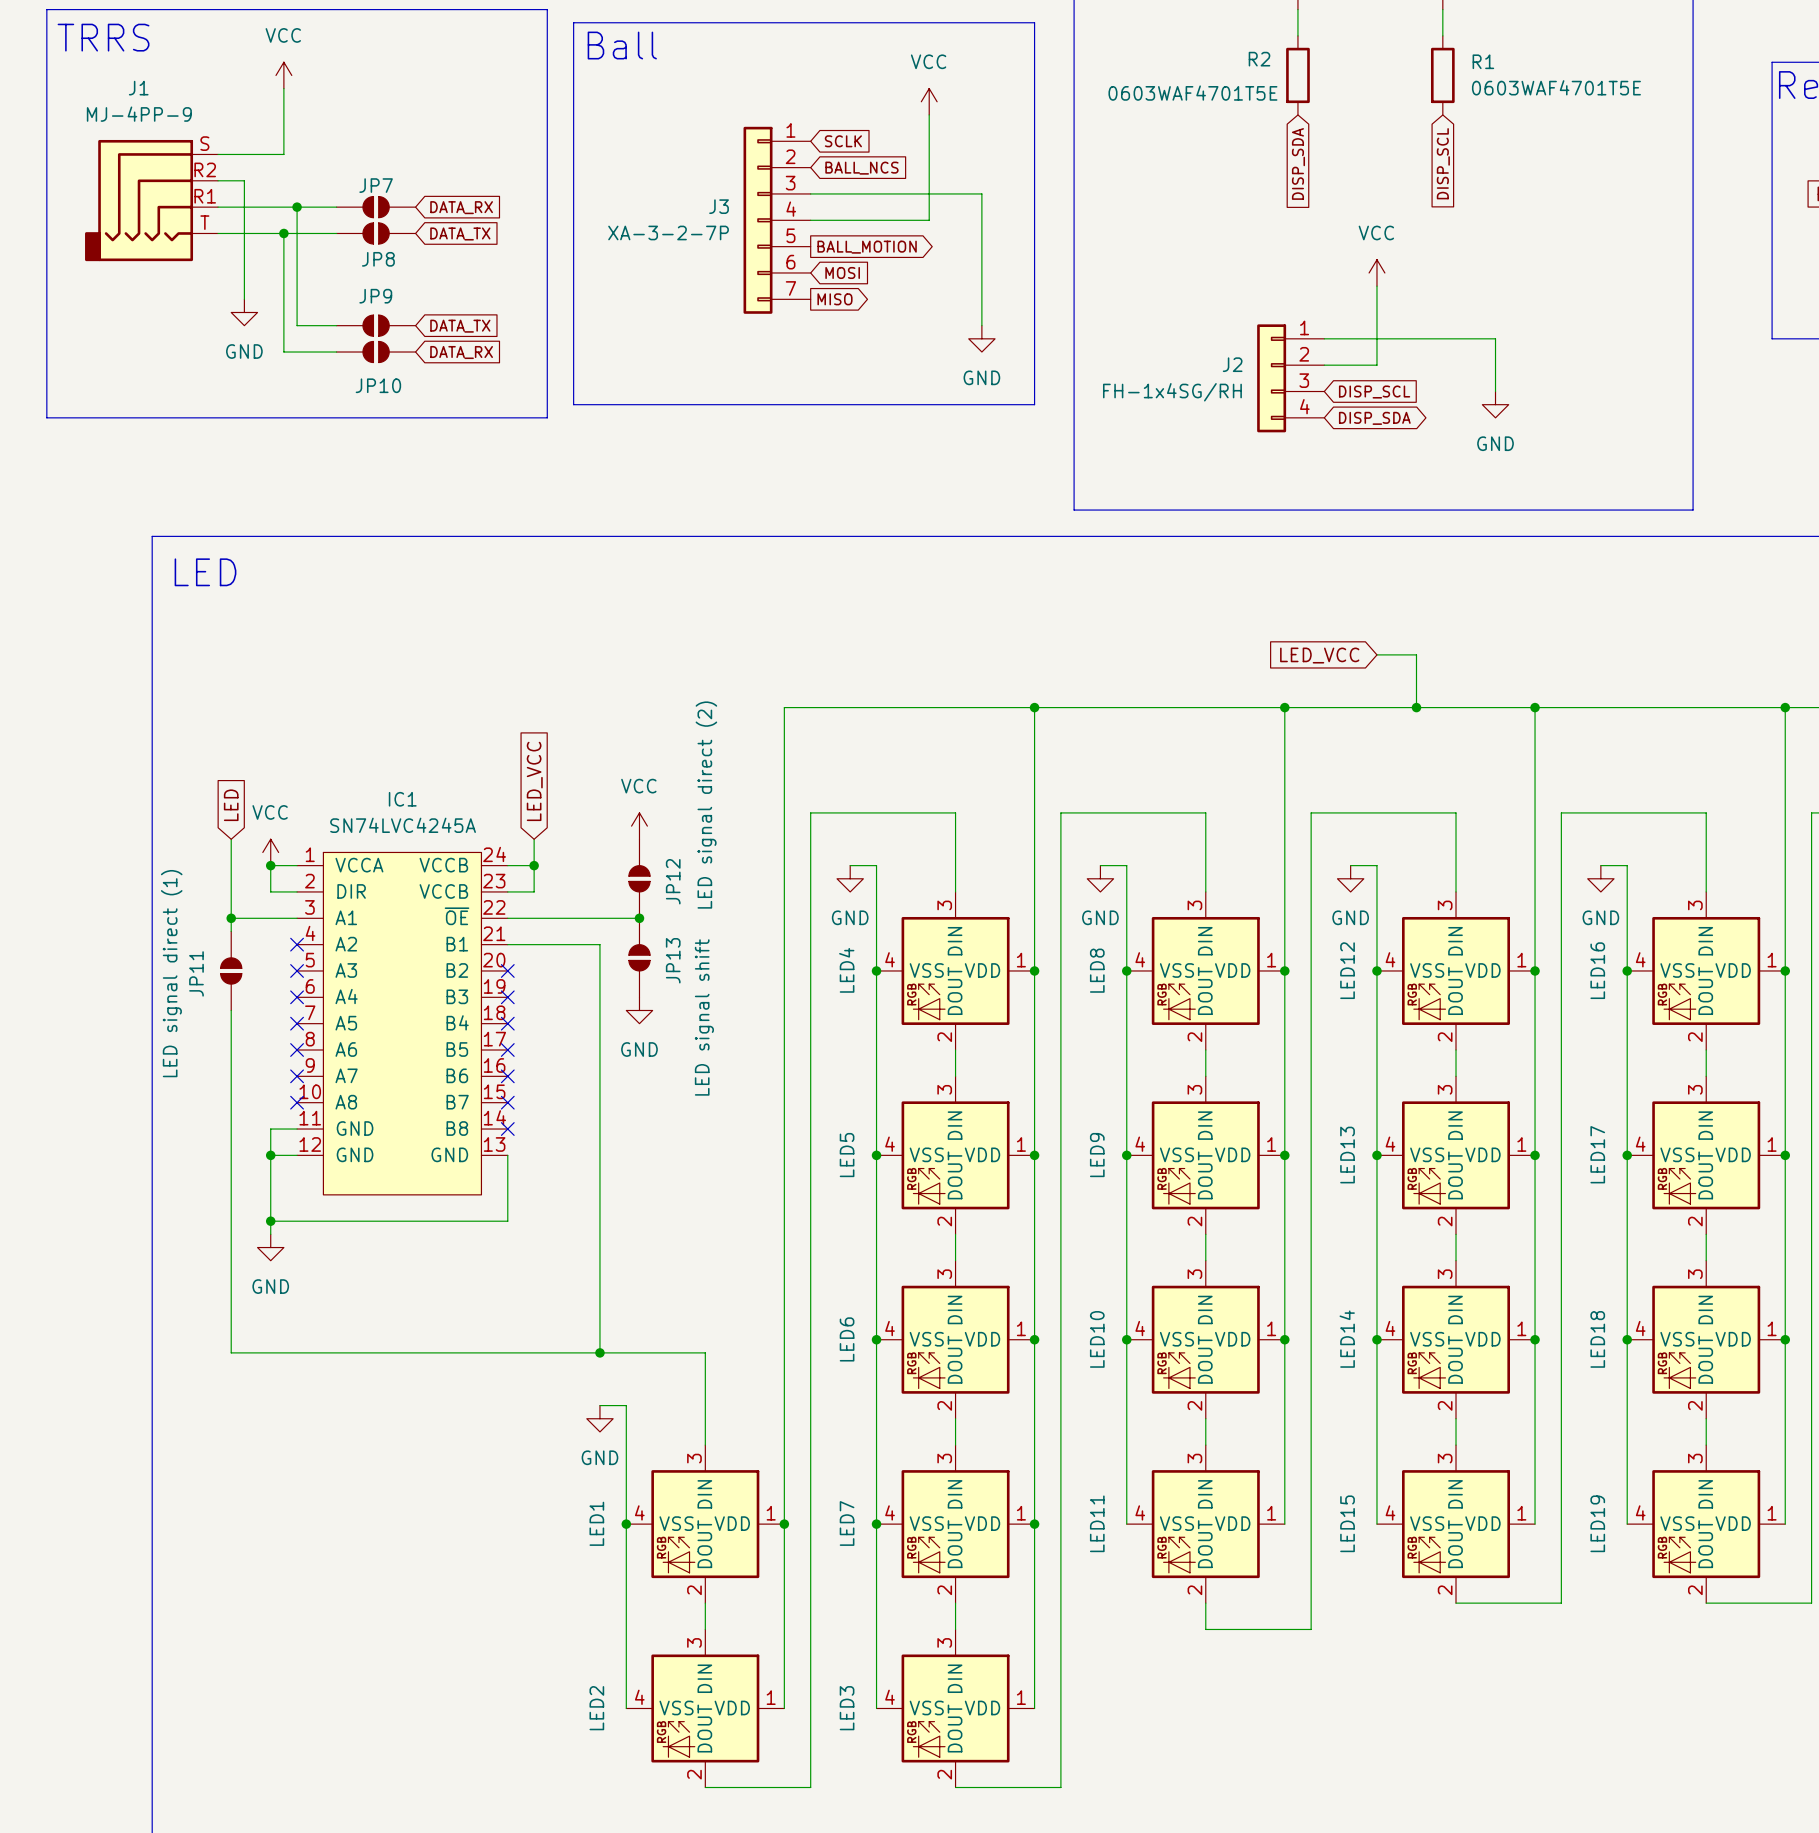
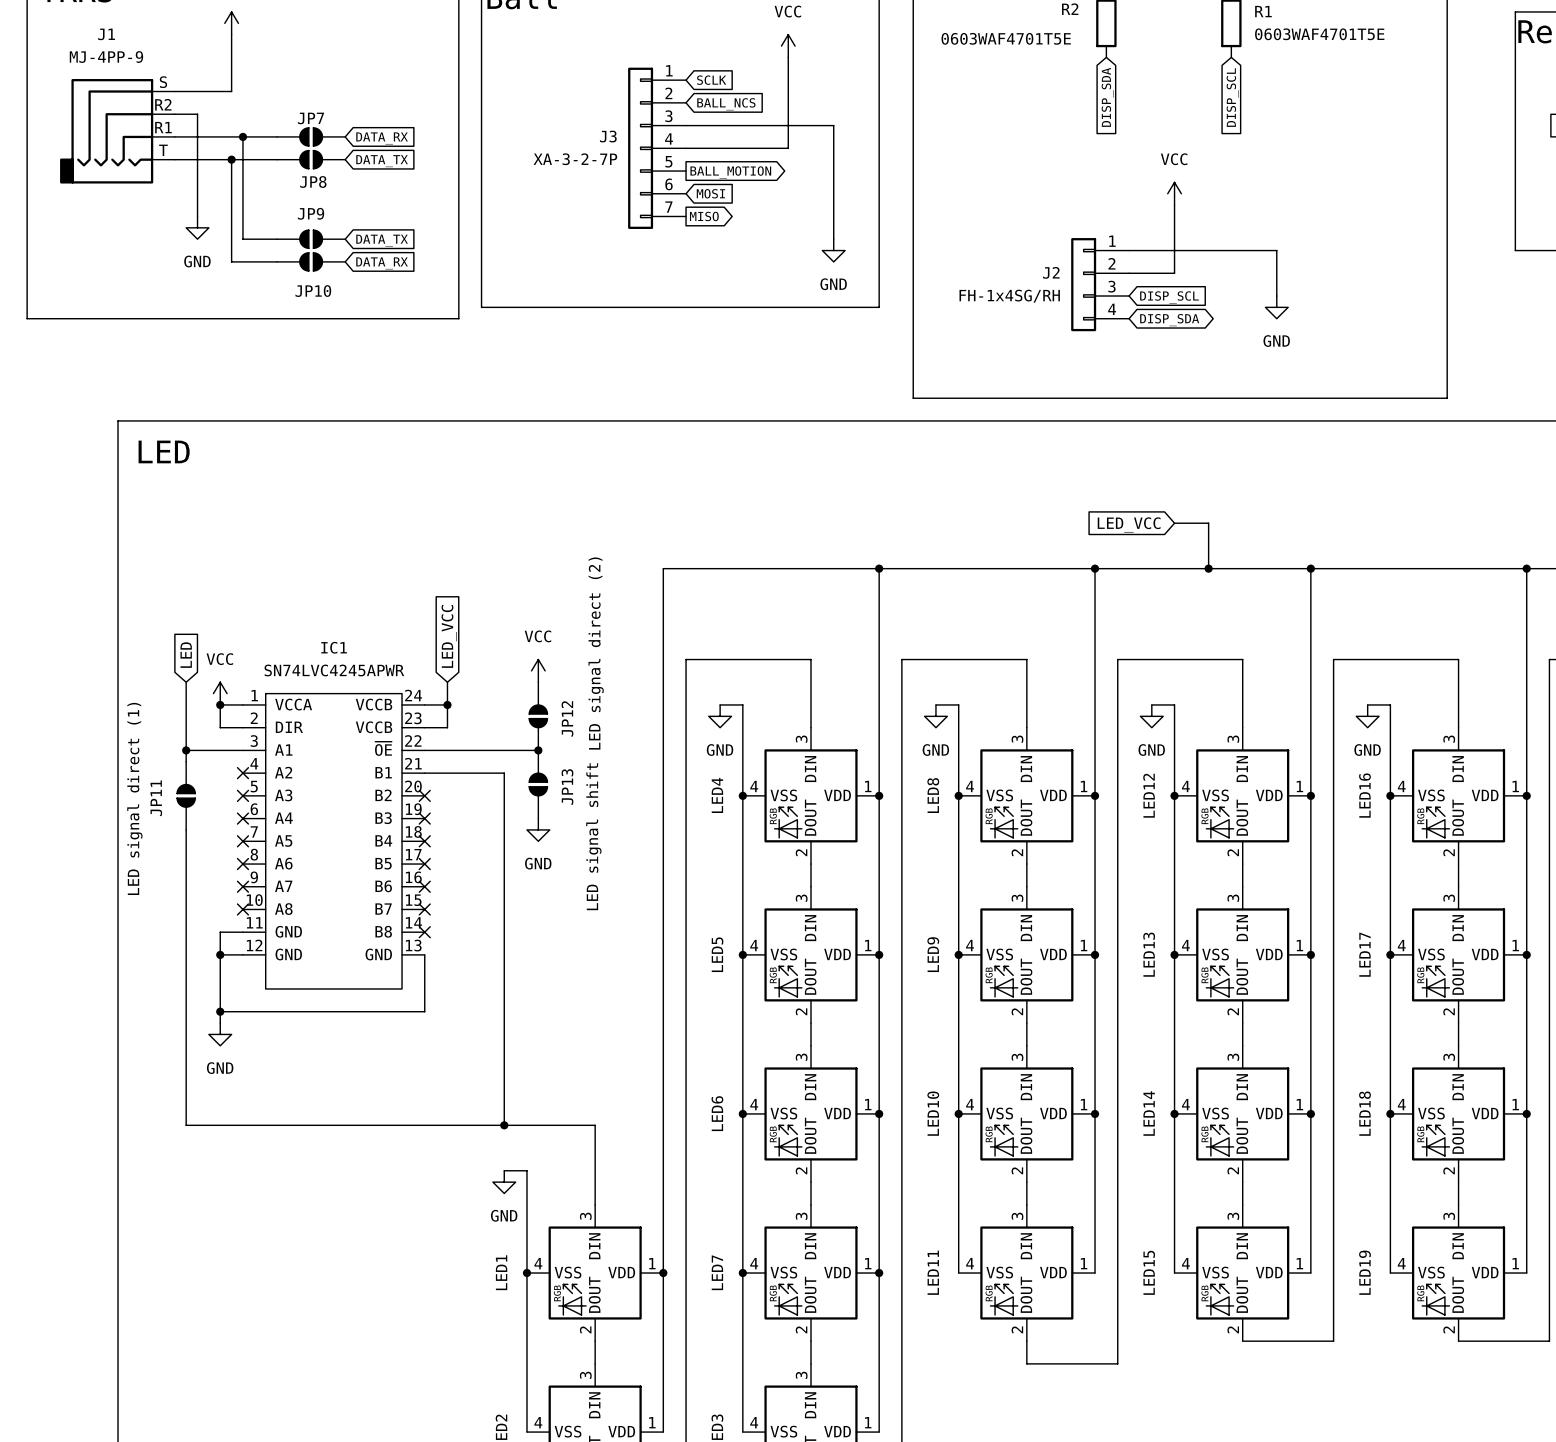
IC1 value: SN74LVC4245A (403, 825) -> SN74LVC4245APWR (334, 670)

